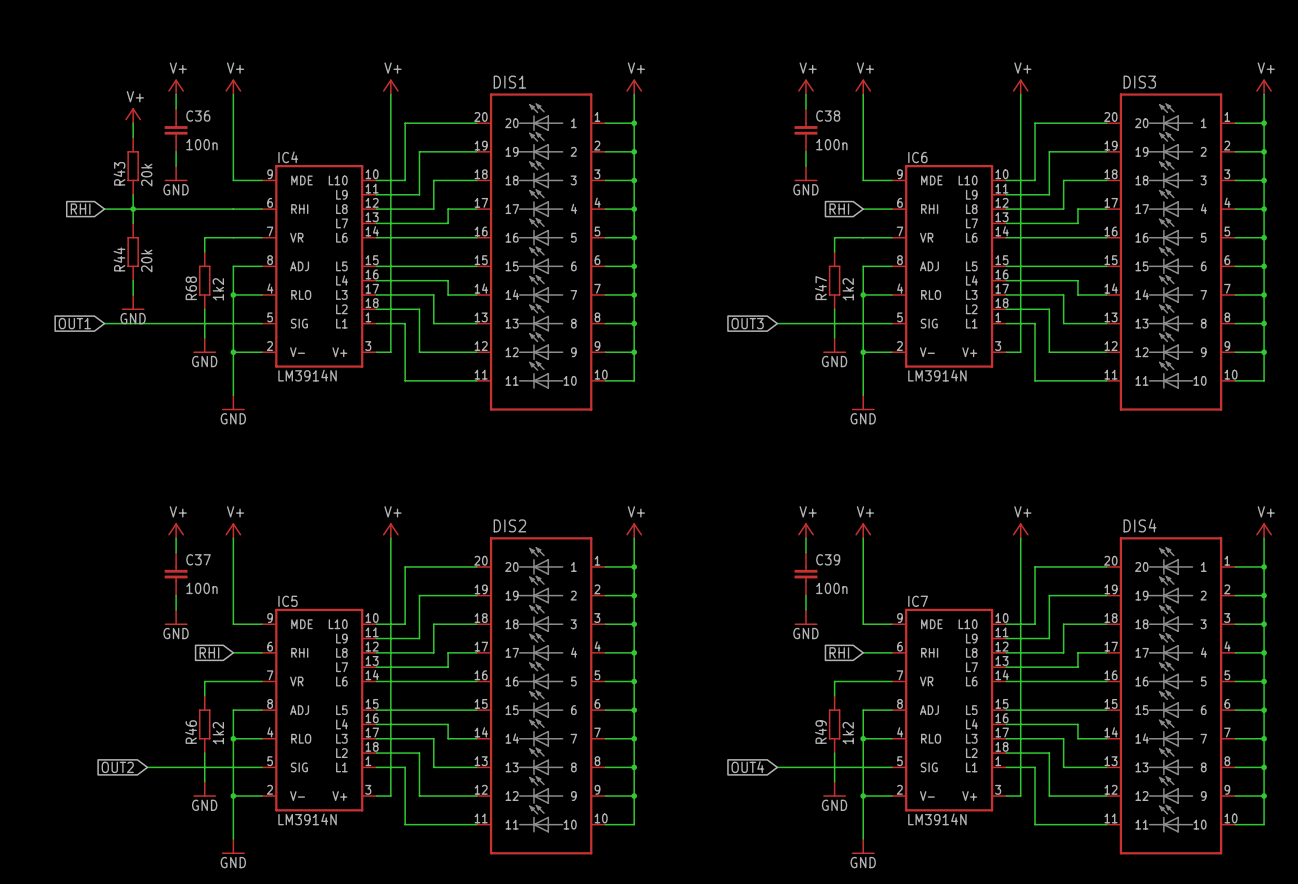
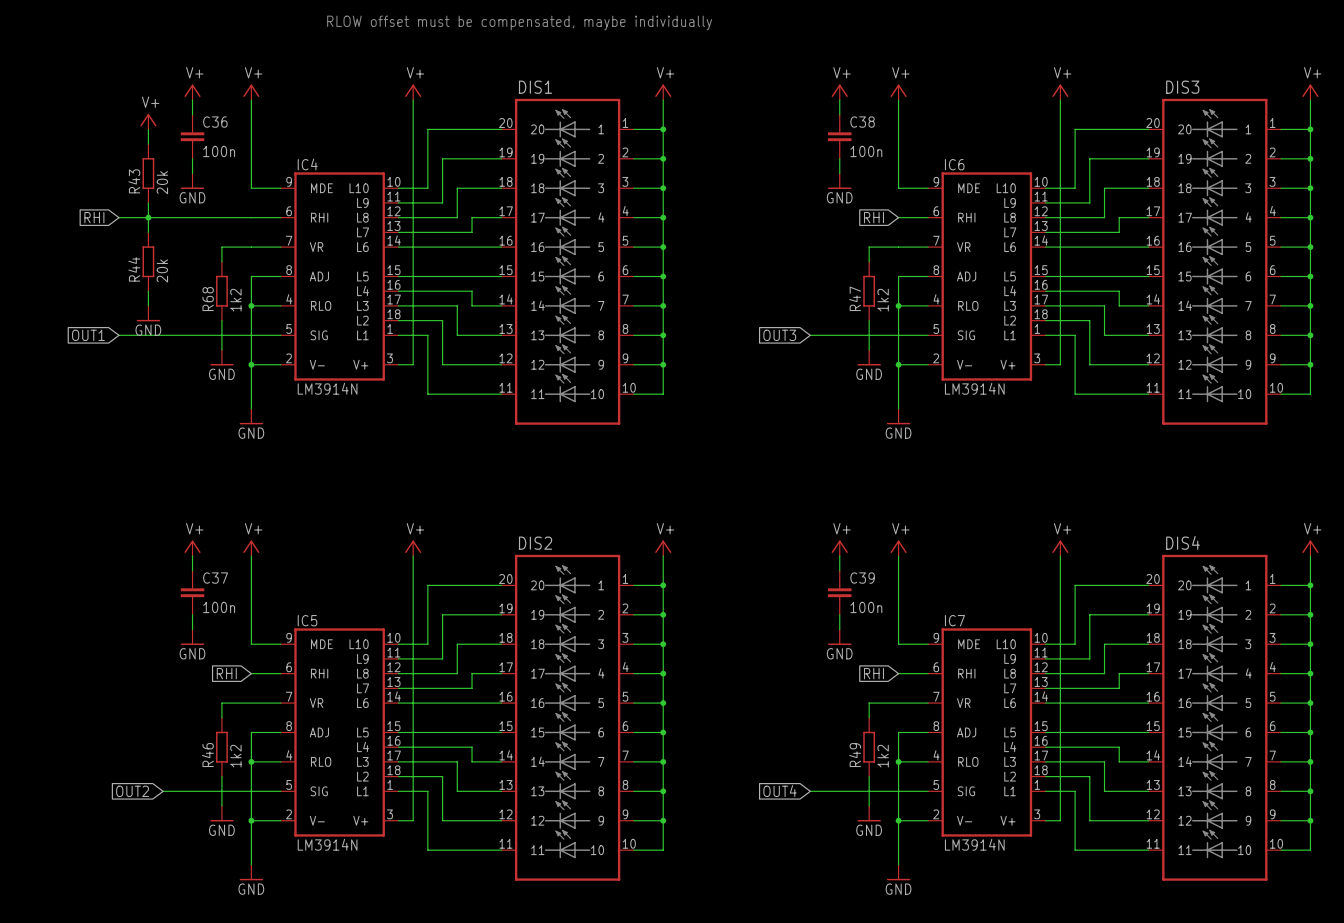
text: none -> RLOW offset must be compensated, maybe individually (519, 23)

